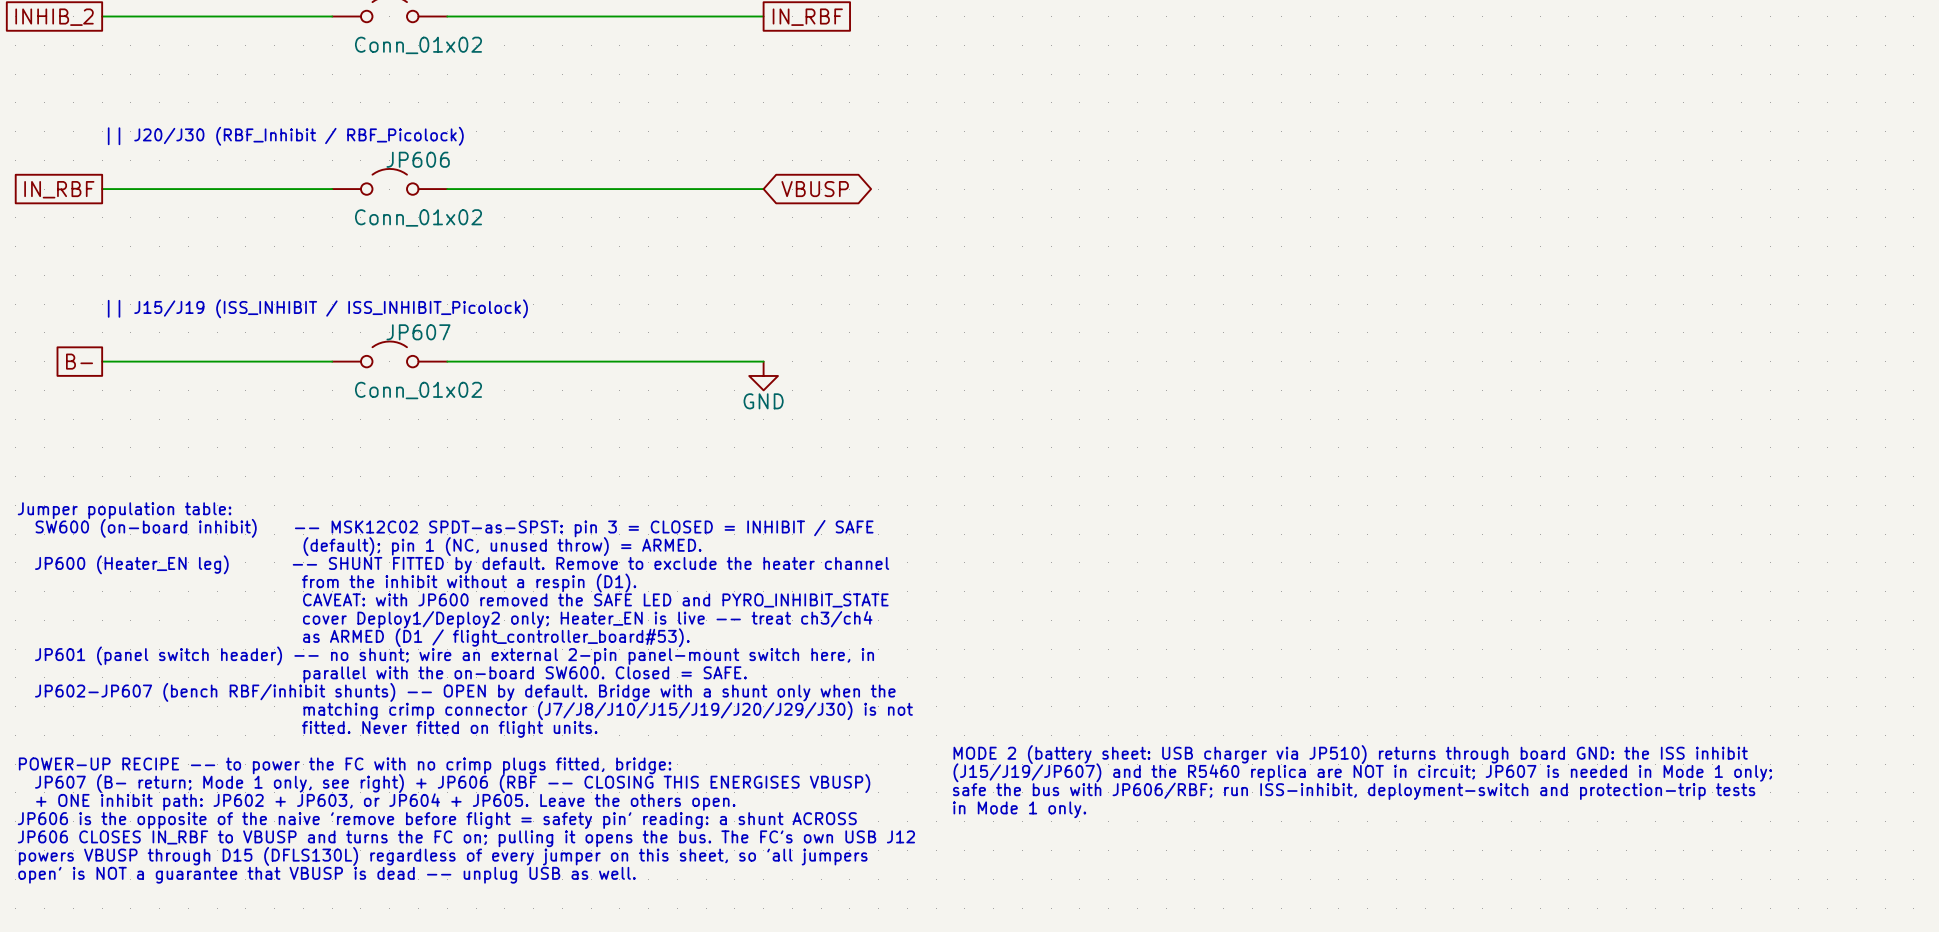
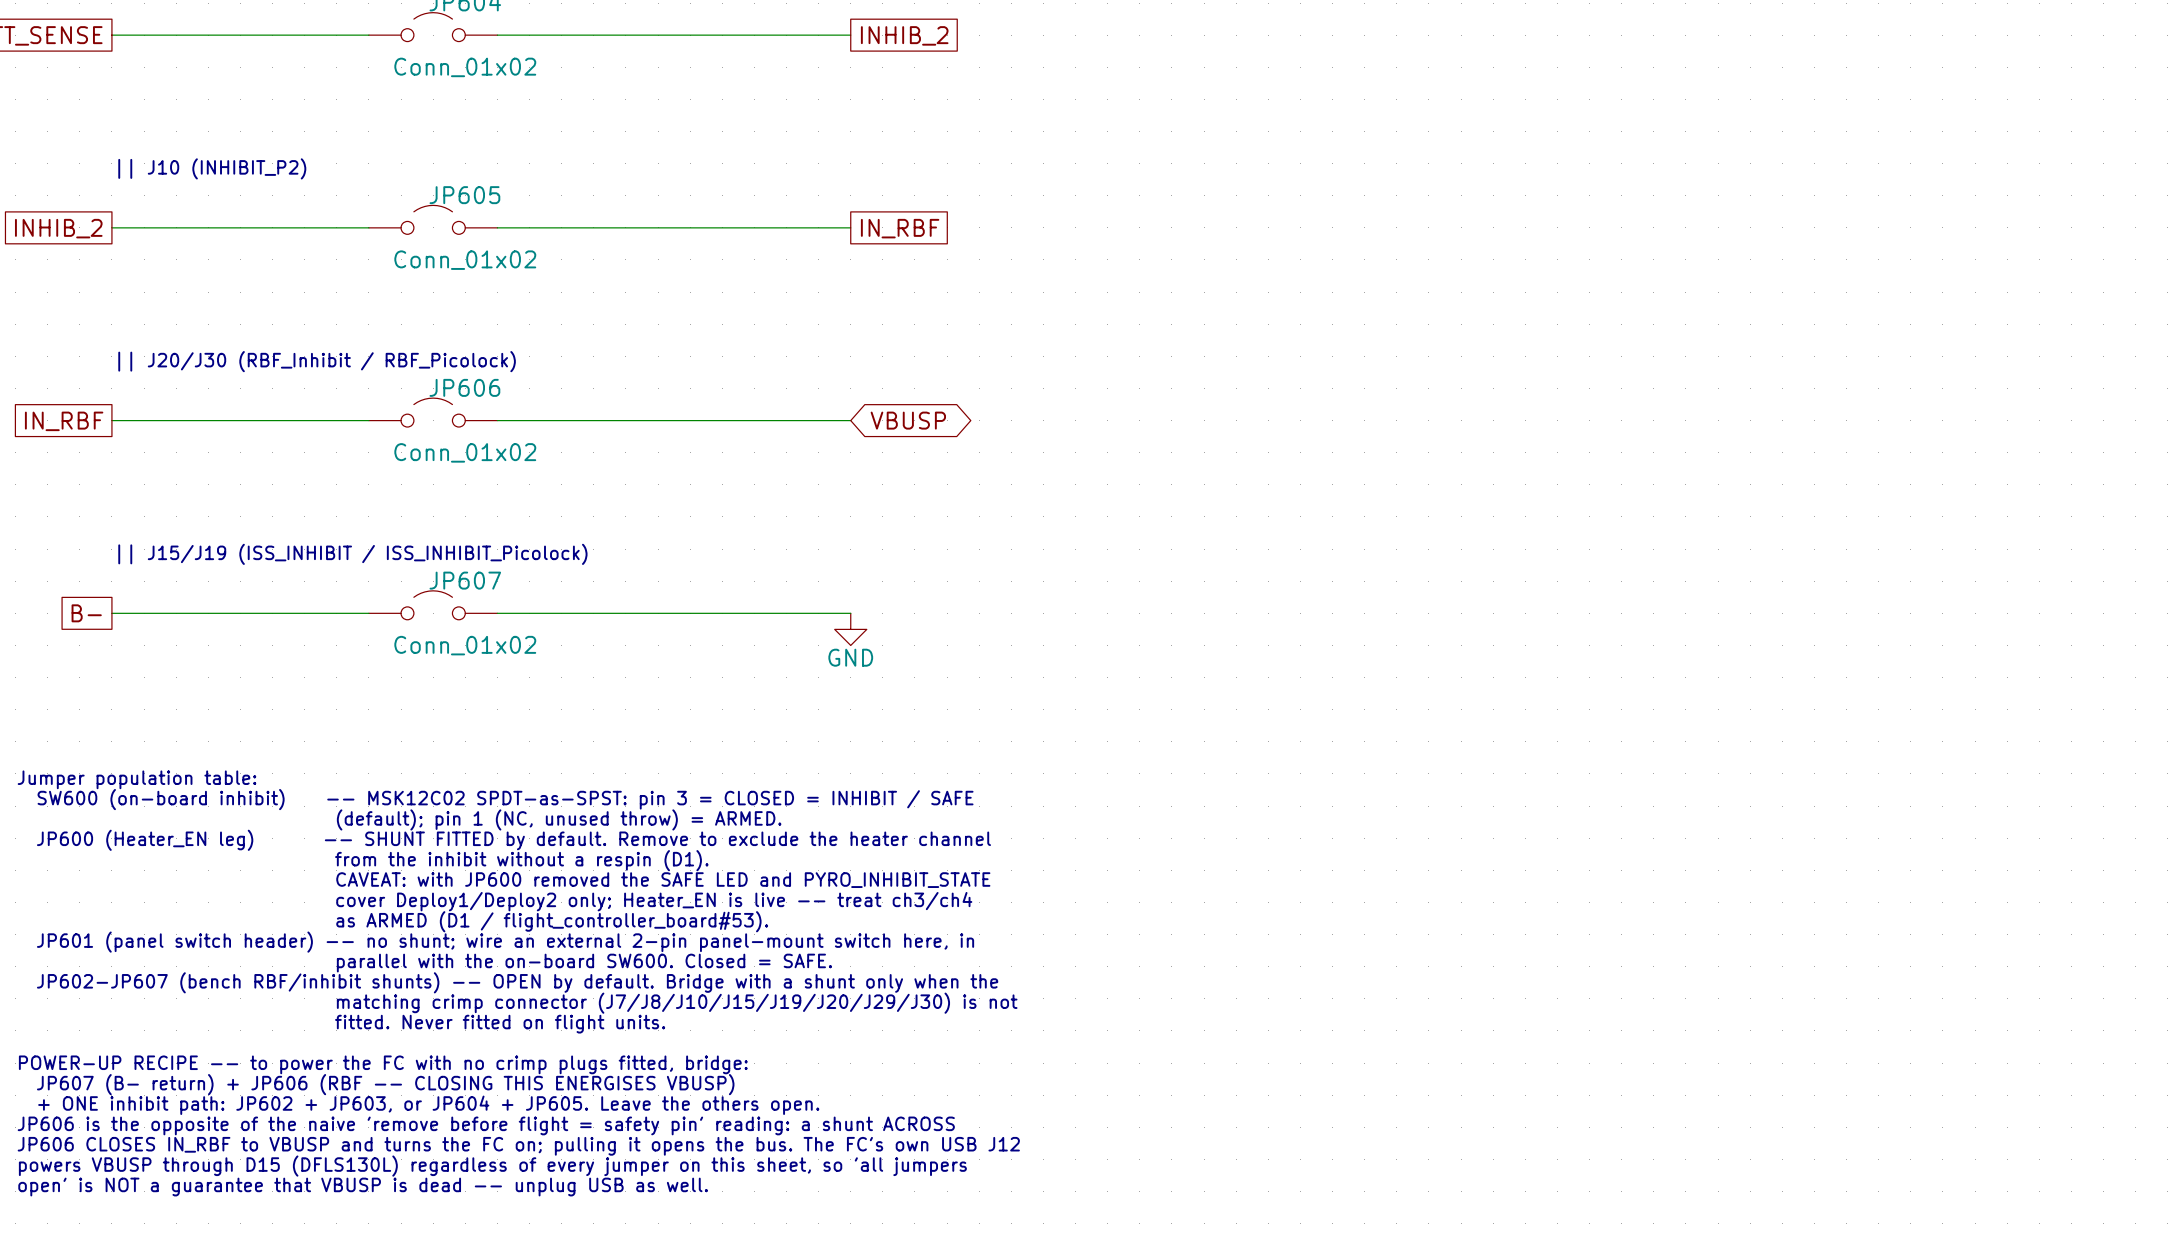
text: MODE 2 (battery sheet: USB charger via JP510) returns through board GND: the ISS inhibit (1350, 754) -> none
text: (J15/J19/JP607) and the R5460 replica are NOT in circuit; JP607 is needed in Mode 1 only; (1362, 772) -> none
text: JP607 (B- return; Mode 1 only, see right) + JP606 (RBF -- CLOSING THIS ENERGISES VBUSP) (452, 783) -> JP607 (B- return) + JP606 (RBF -- CLOSING THIS ENERGISES VBUSP) (385, 1084)
text: safe the bus with JP606/RBF; run ISS-inhibit, deployment-switch and protection-trip tests (1354, 791) -> none
text: in Mode 1 only. (1019, 809) -> none

